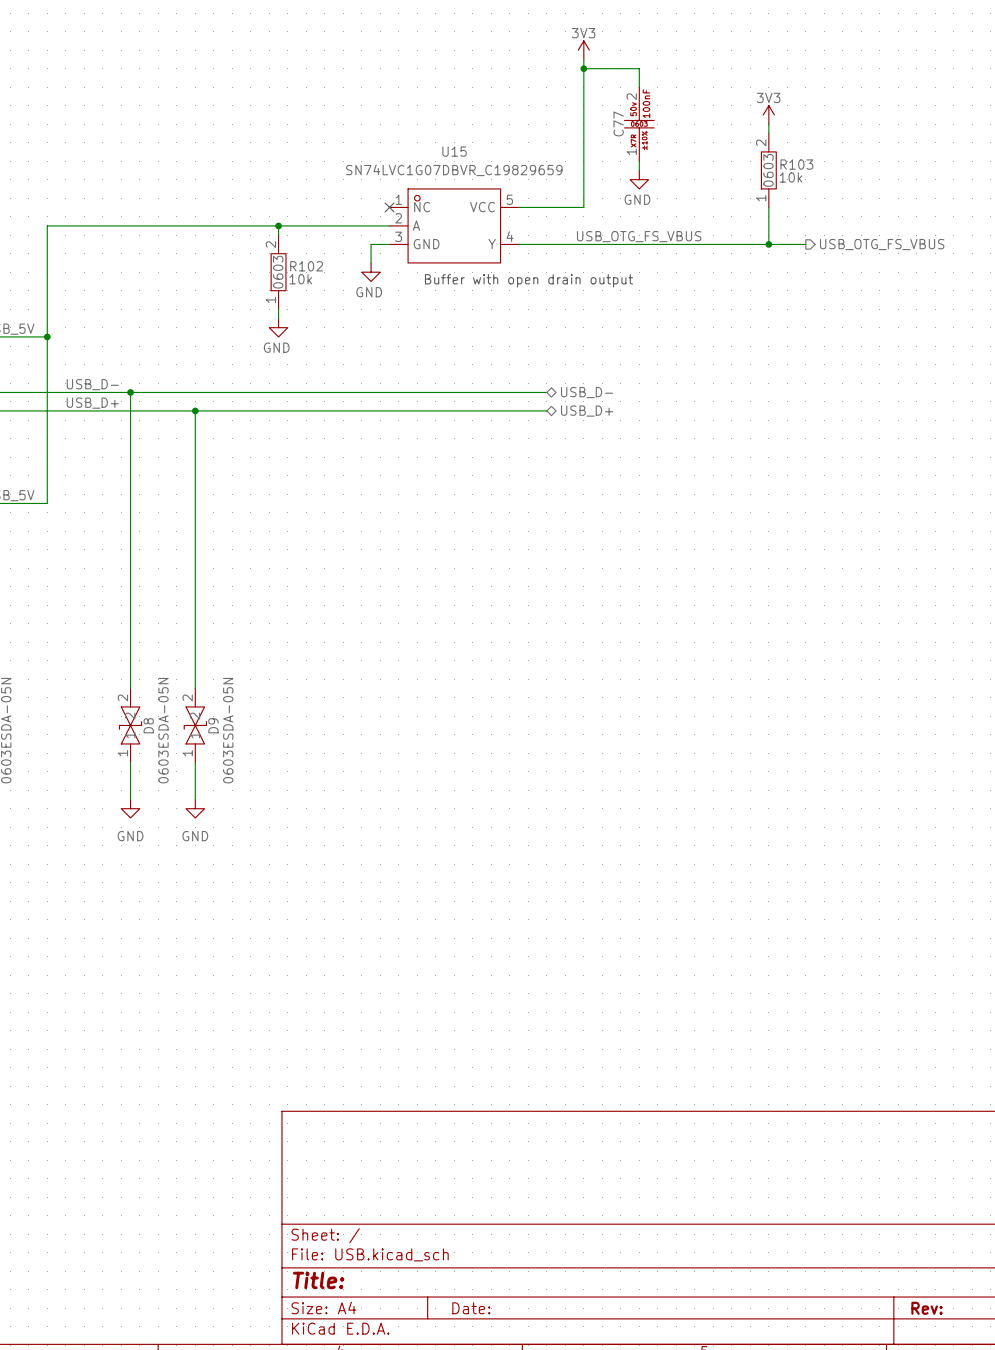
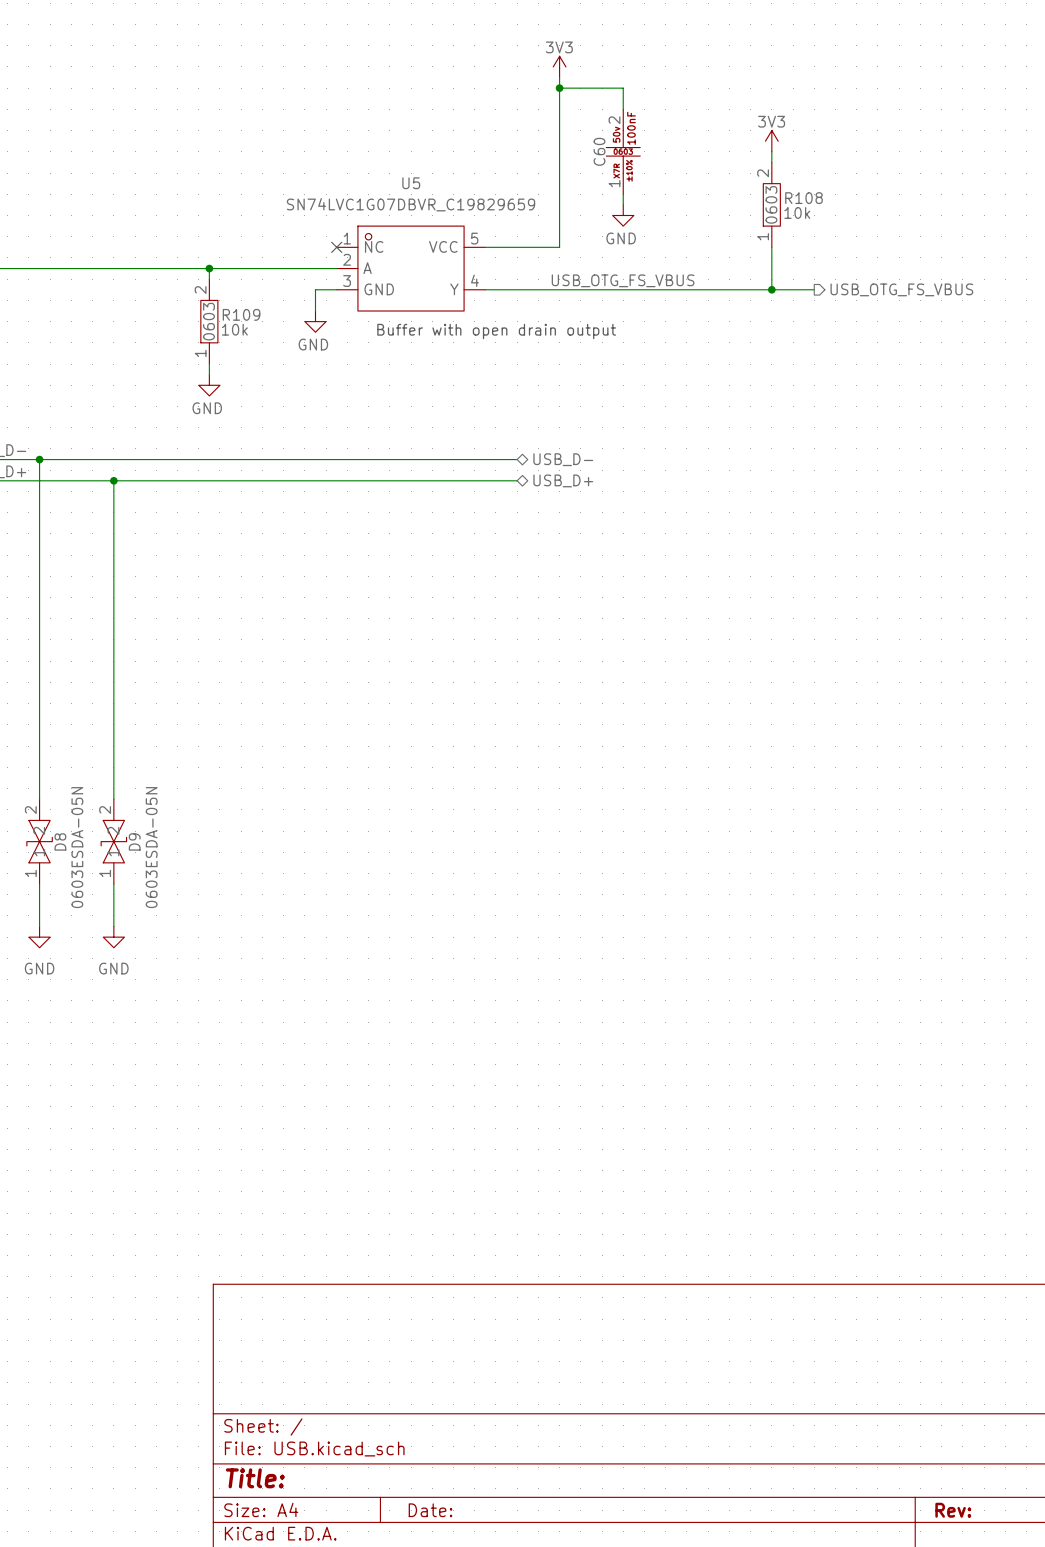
C77 name: C77 (618, 123) -> C60 (599, 151)
U15 name: U15 (454, 151) -> U5 (411, 183)
R103 name: R103 (796, 164) -> R108 (804, 198)
R102 name: R102 (306, 266) -> R109 (241, 314)

